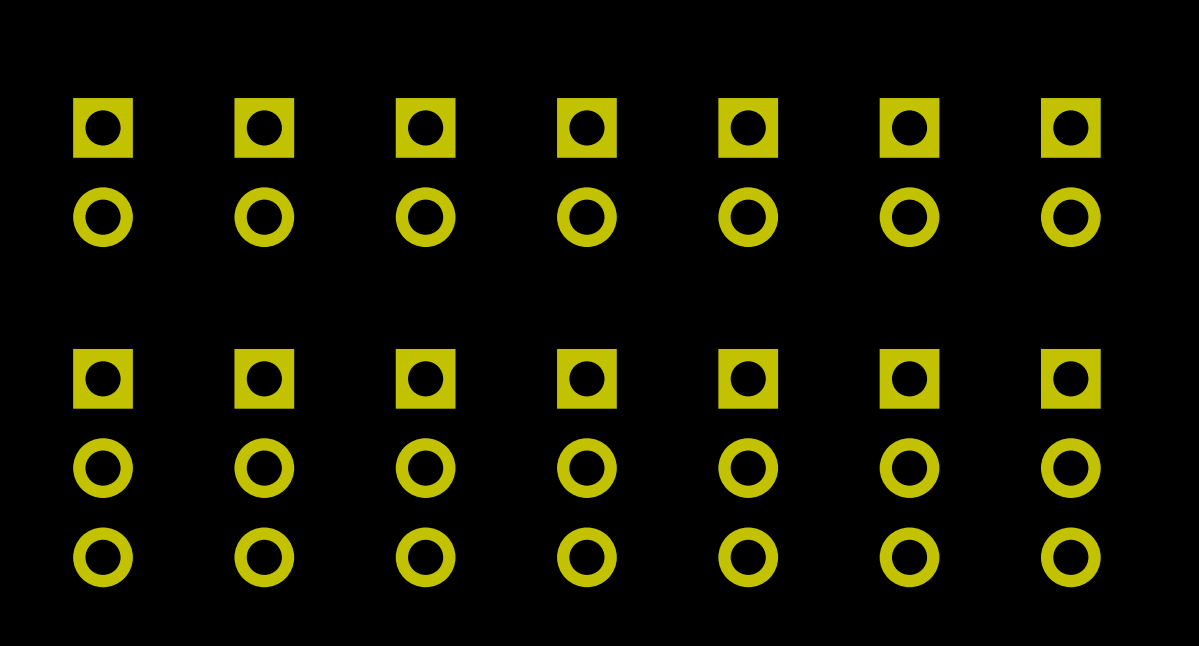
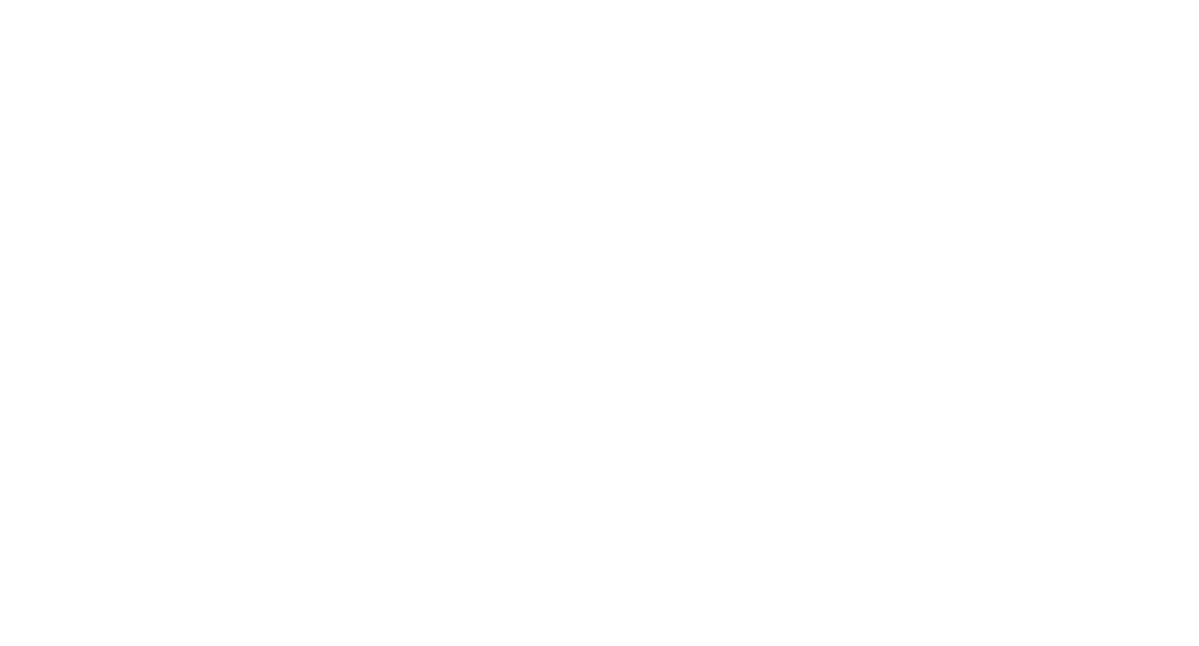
part: (103, 172) -> none
part: (264, 172) -> none
part: (425, 172) -> none
part: (586, 172) -> none
part: (748, 172) -> none
part: (909, 172) -> none
part: (1070, 172) -> none
part: (103, 468) -> none
part: (264, 468) -> none
part: (425, 468) -> none
part: (586, 468) -> none
part: (748, 468) -> none
part: (909, 468) -> none
part: (1070, 468) -> none

